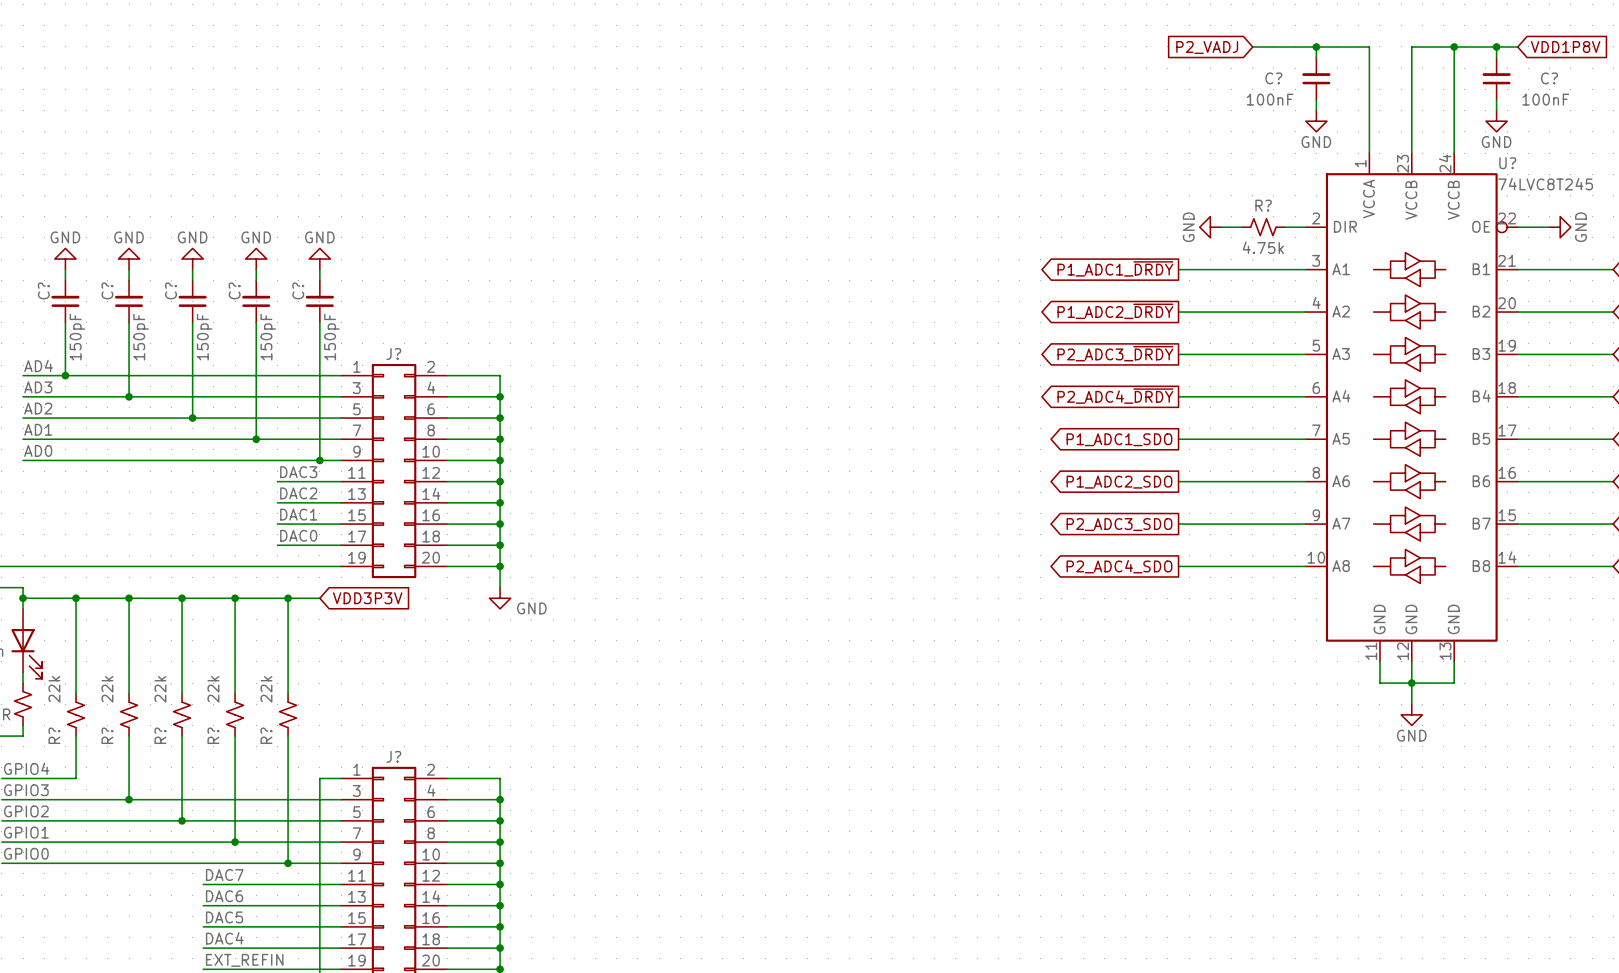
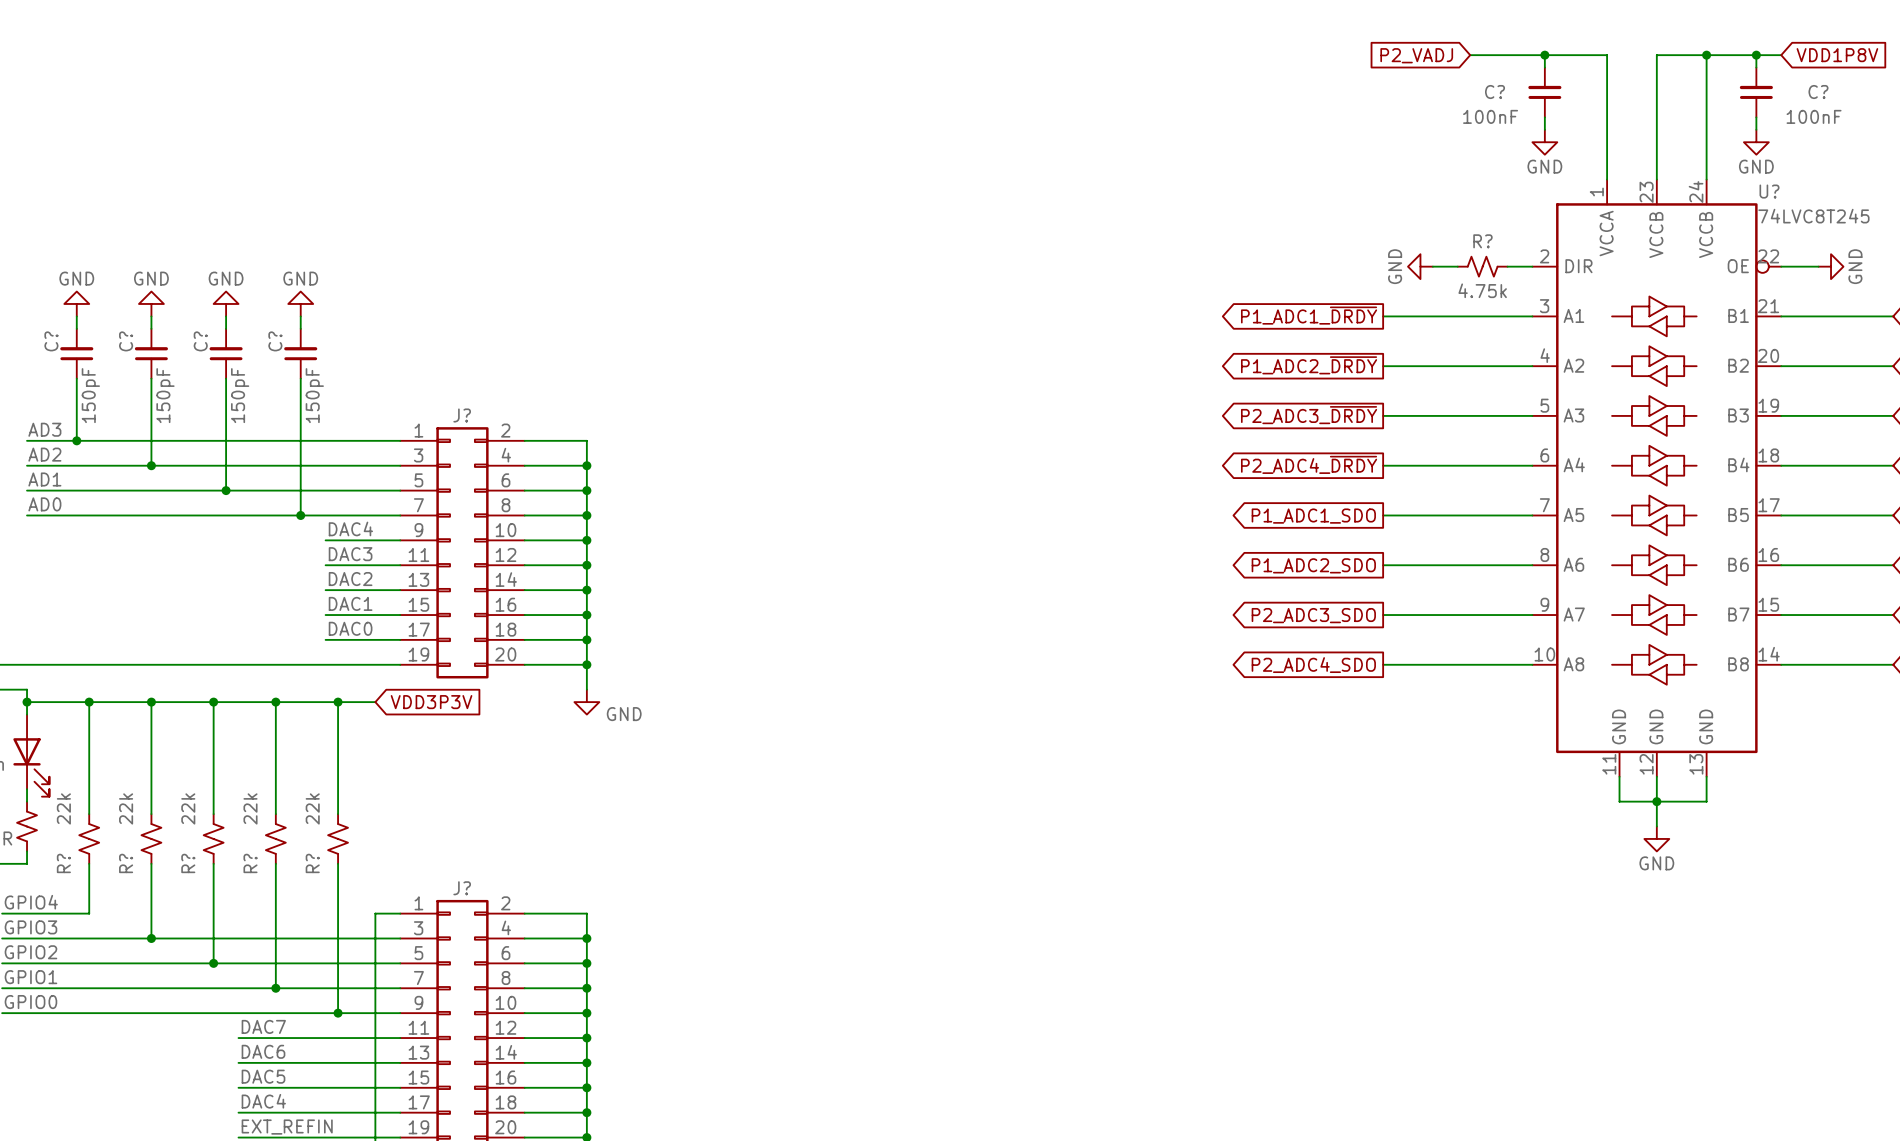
power symbol: GND (319, 259) -> none
wire: (319, 269) (319, 280) -> none
C?: 150pF (319, 301) -> none
wire: (319, 322) (319, 460) -> none
label: AD4 (38, 365) -> AD3 (44, 429)
label: AD3 (38, 387) -> AD2 (44, 454)
label: AD2 (38, 408) -> AD1 (44, 479)
label: AD1 (38, 429) -> AD0 (44, 504)
label: AD0 (38, 450) -> none
label: none -> DAC4 (350, 528)
wire: (23, 460) (277, 460) -> none
junction: (319, 460) -> none

